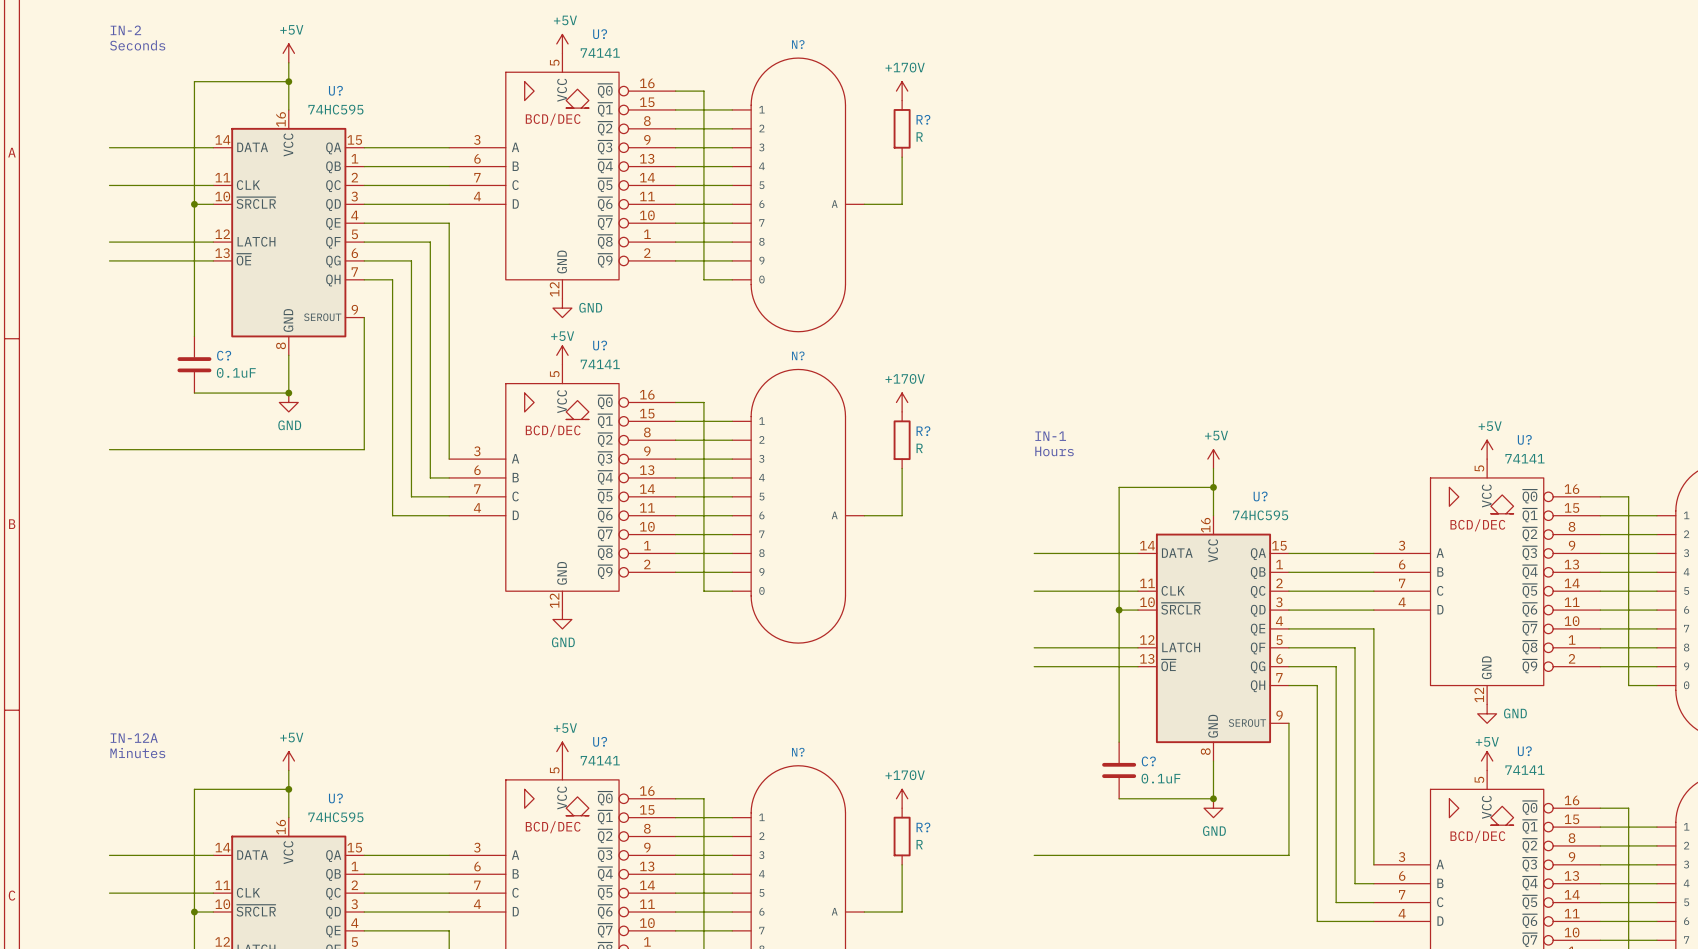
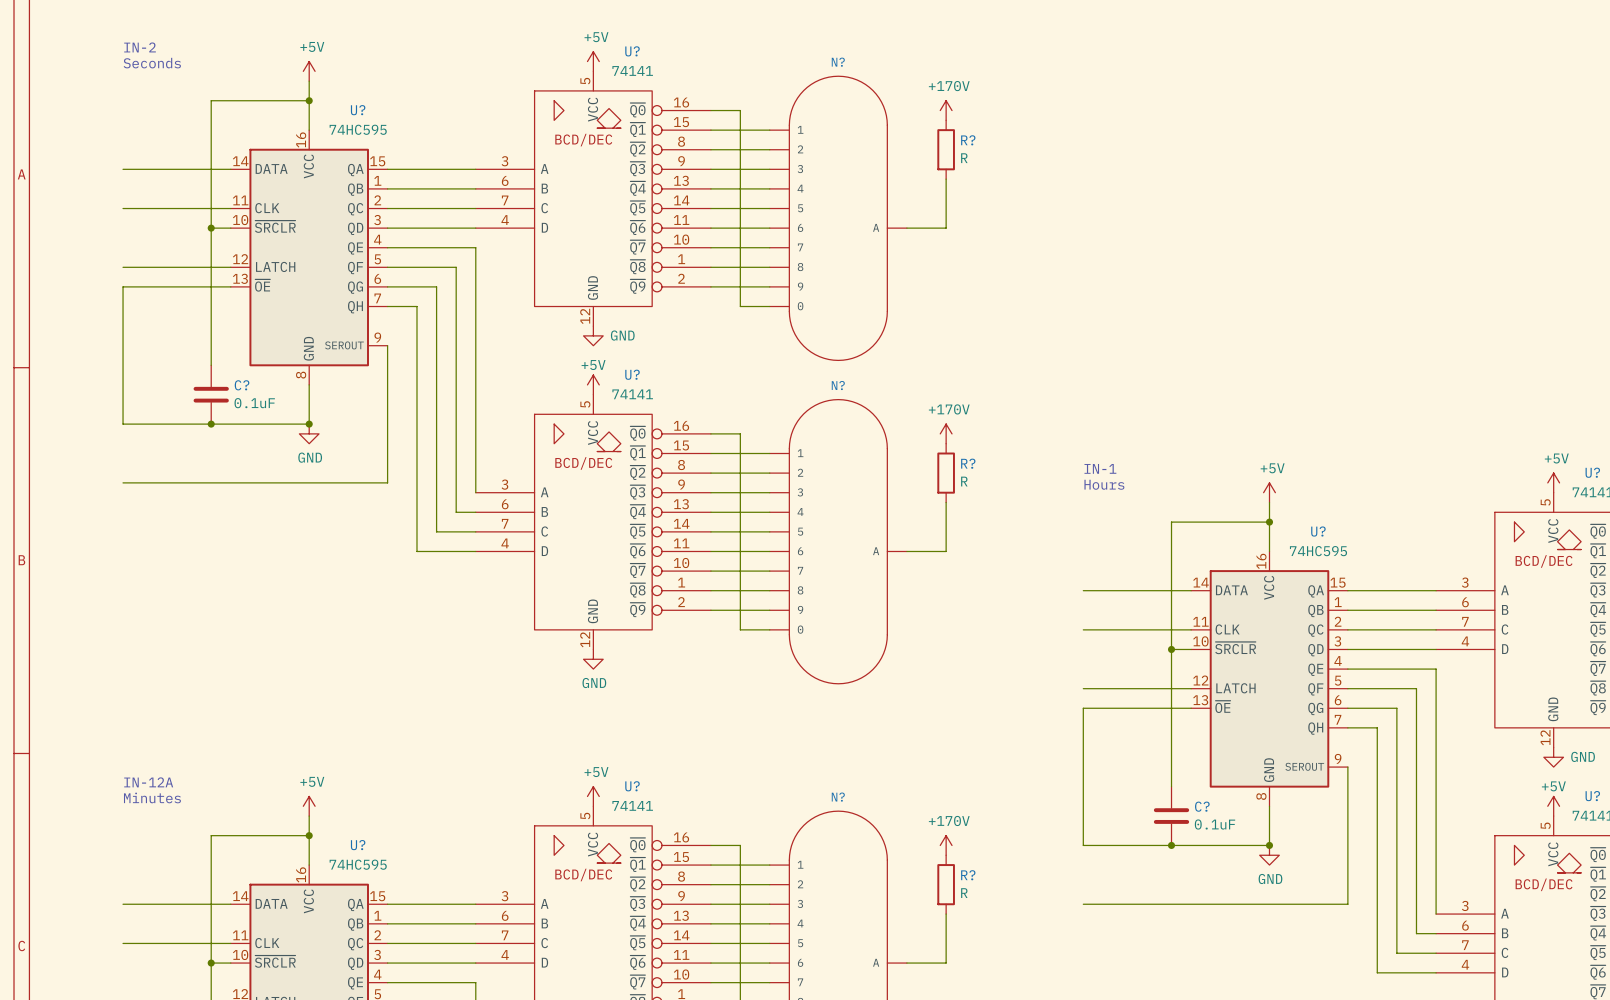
wire: none -> (123, 286) (123, 424) (211, 424)
junction: none -> (211, 424)
wire: none -> (1083, 708) (1083, 845) (1171, 845)
junction: none -> (1171, 845)

